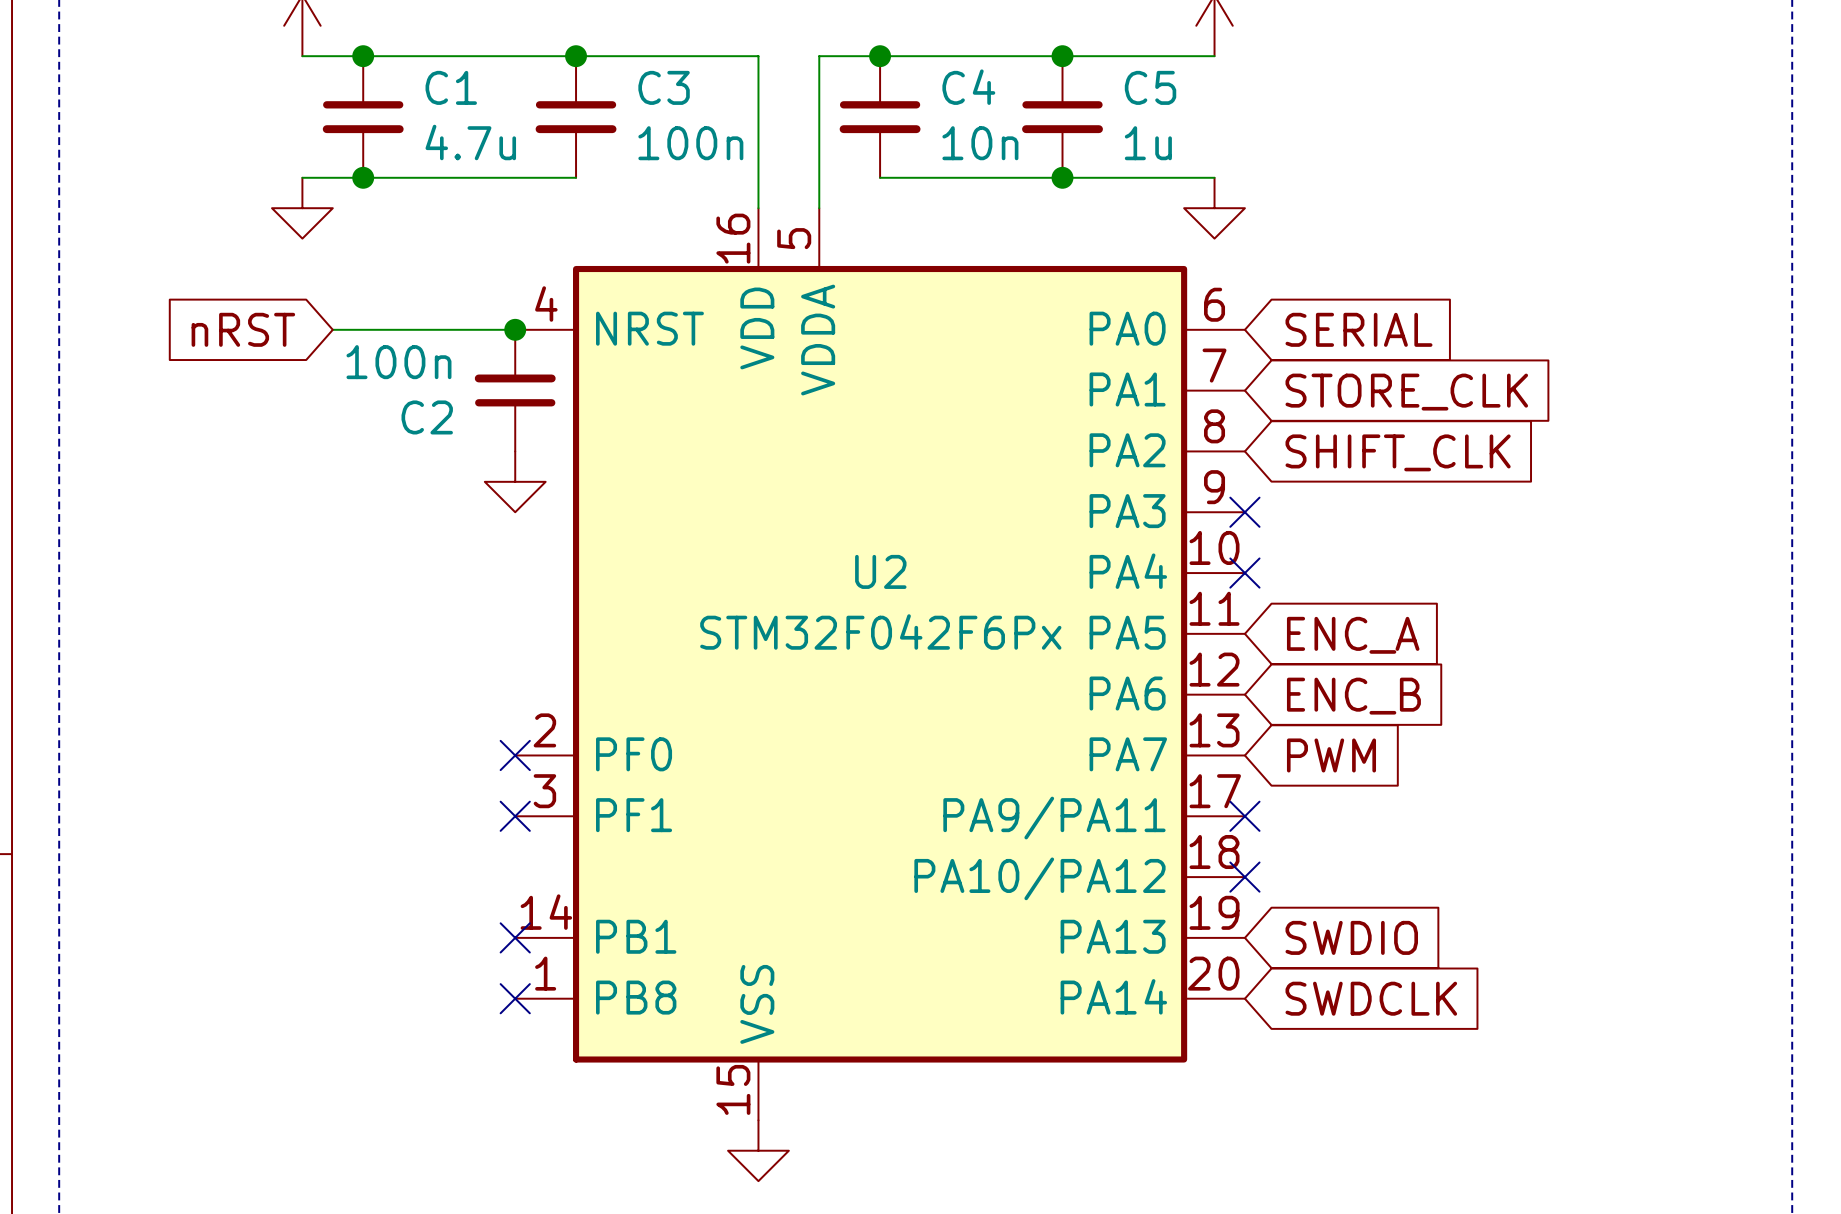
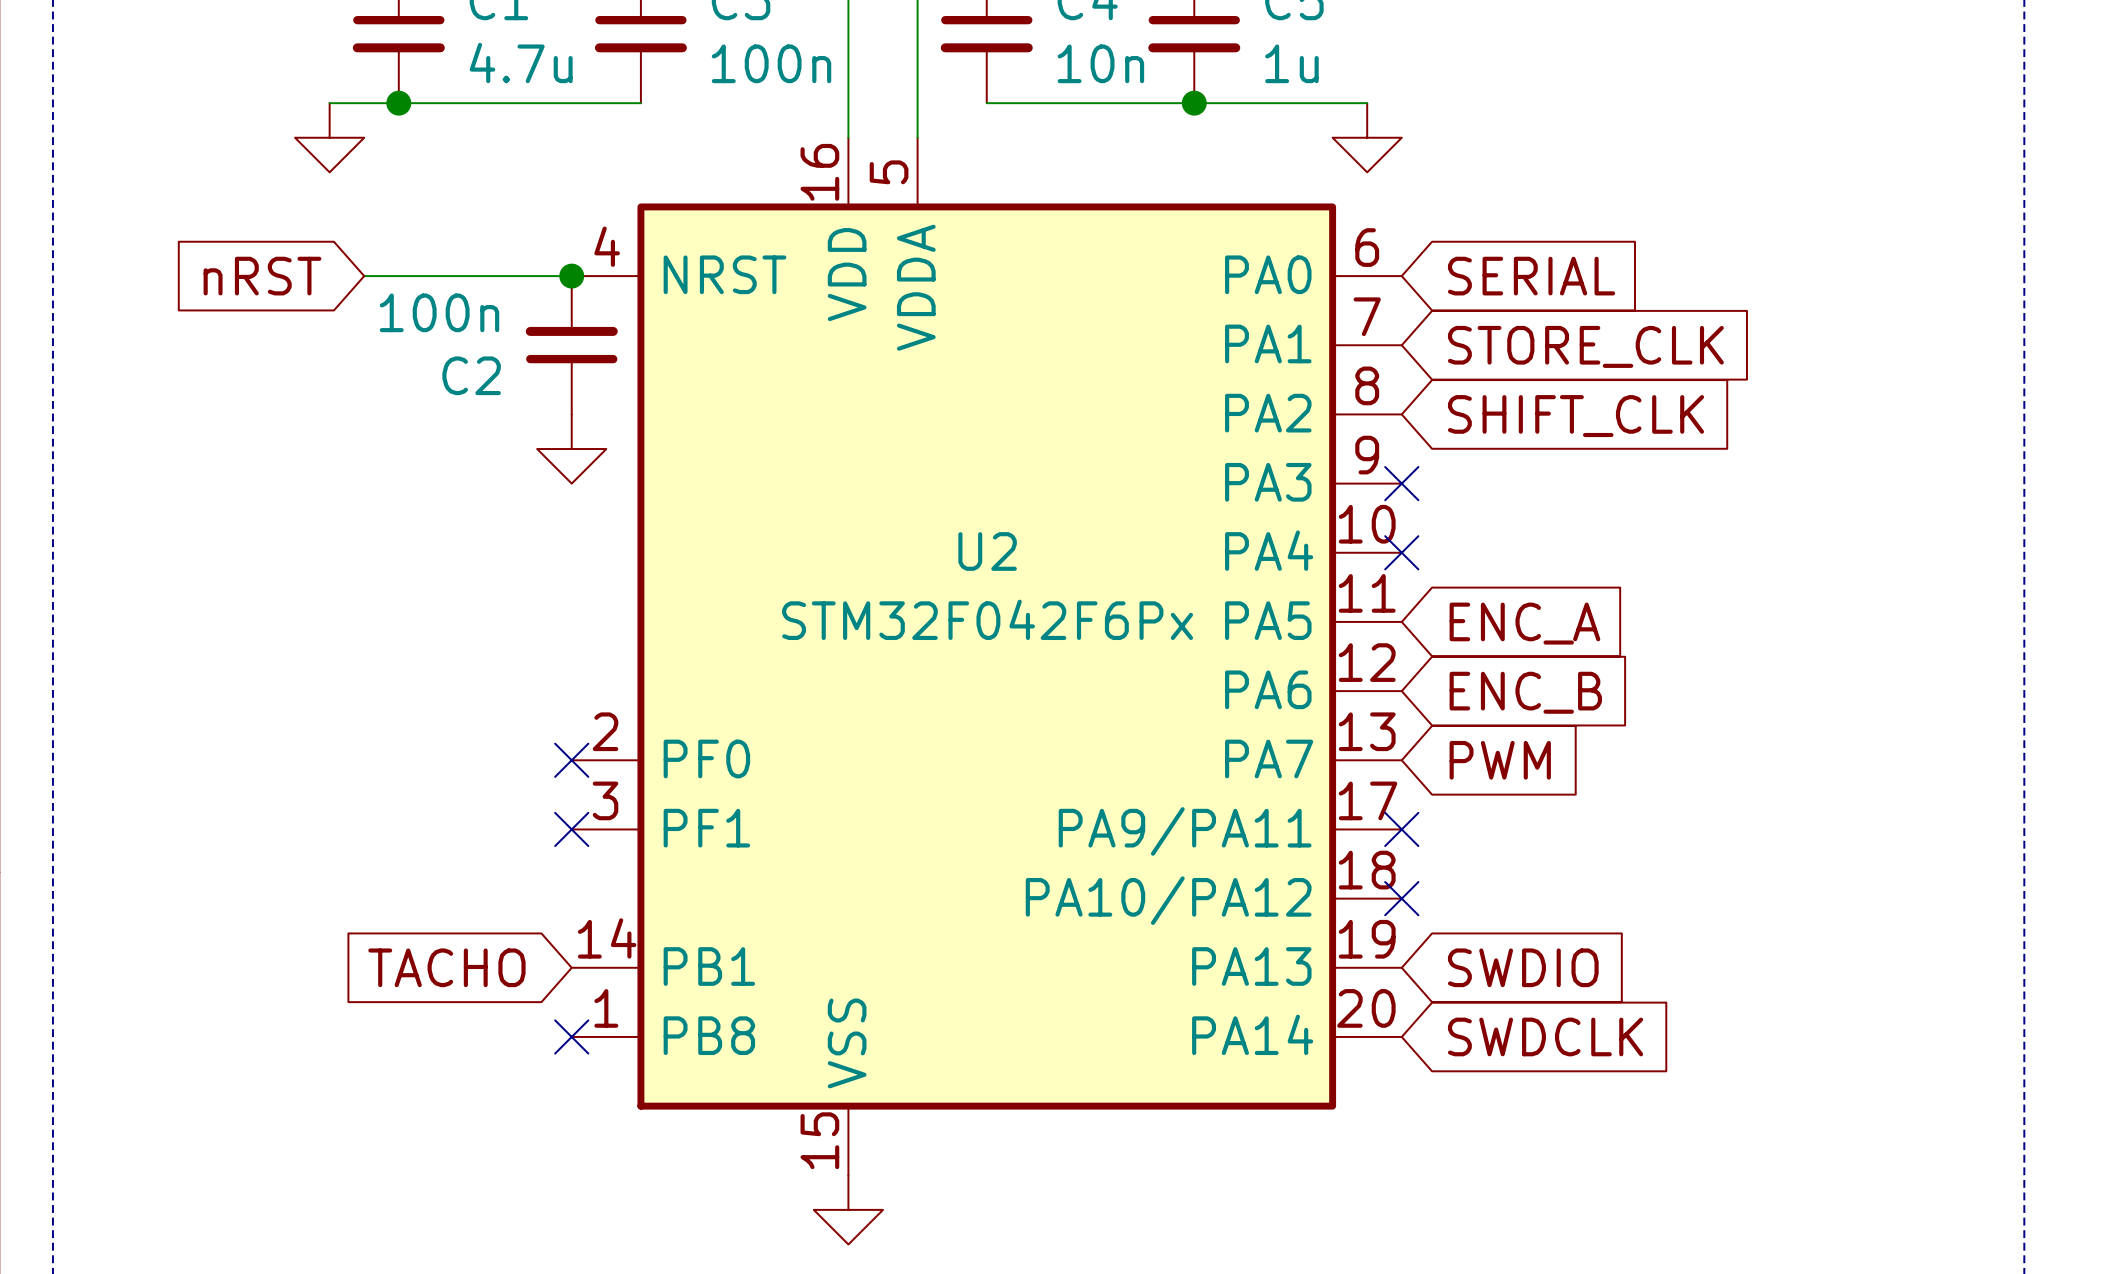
global label: none -> TACHO (446, 967)
no-connect mark: (515, 937) -> none

